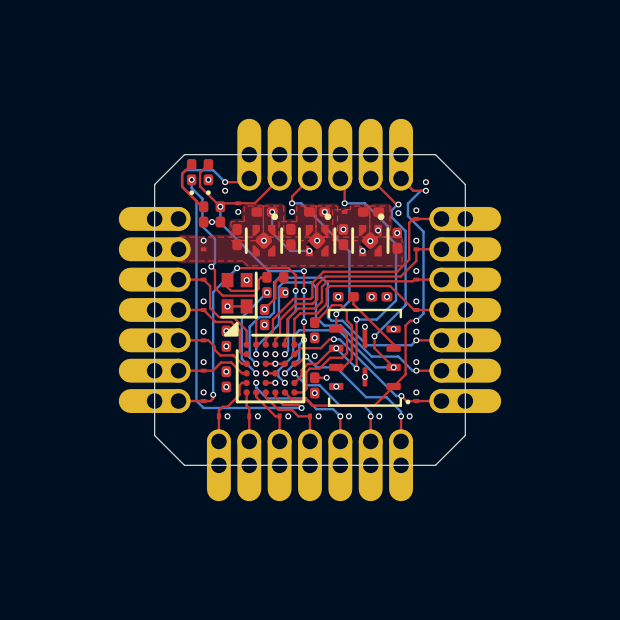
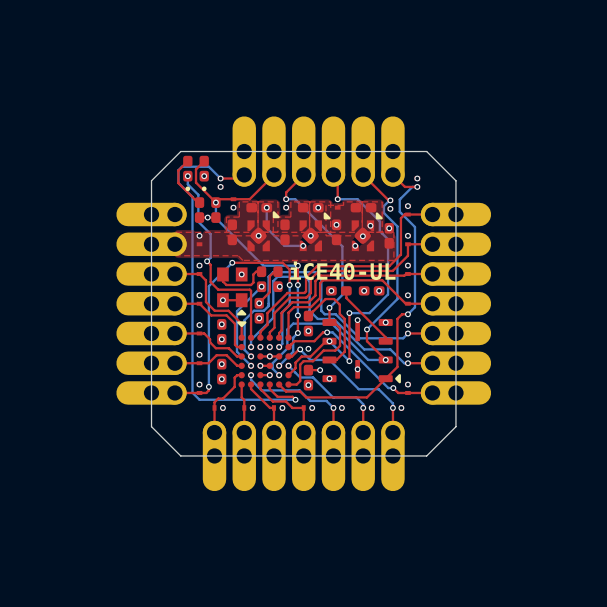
part footprint: [244, 213, 284, 257] -> [247, 211, 280, 252]
part footprint: [298, 213, 337, 257] -> [299, 212, 331, 252]
part footprint: [351, 213, 390, 257] -> [351, 212, 383, 252]
part footprint: [220, 271, 258, 319] -> [217, 267, 248, 316]
text: none -> iCE40-UL (342, 270)
part footprint: [327, 308, 411, 407] -> [322, 318, 401, 384]
part footprint: [223, 321, 306, 404] -> [237, 321, 292, 388]

